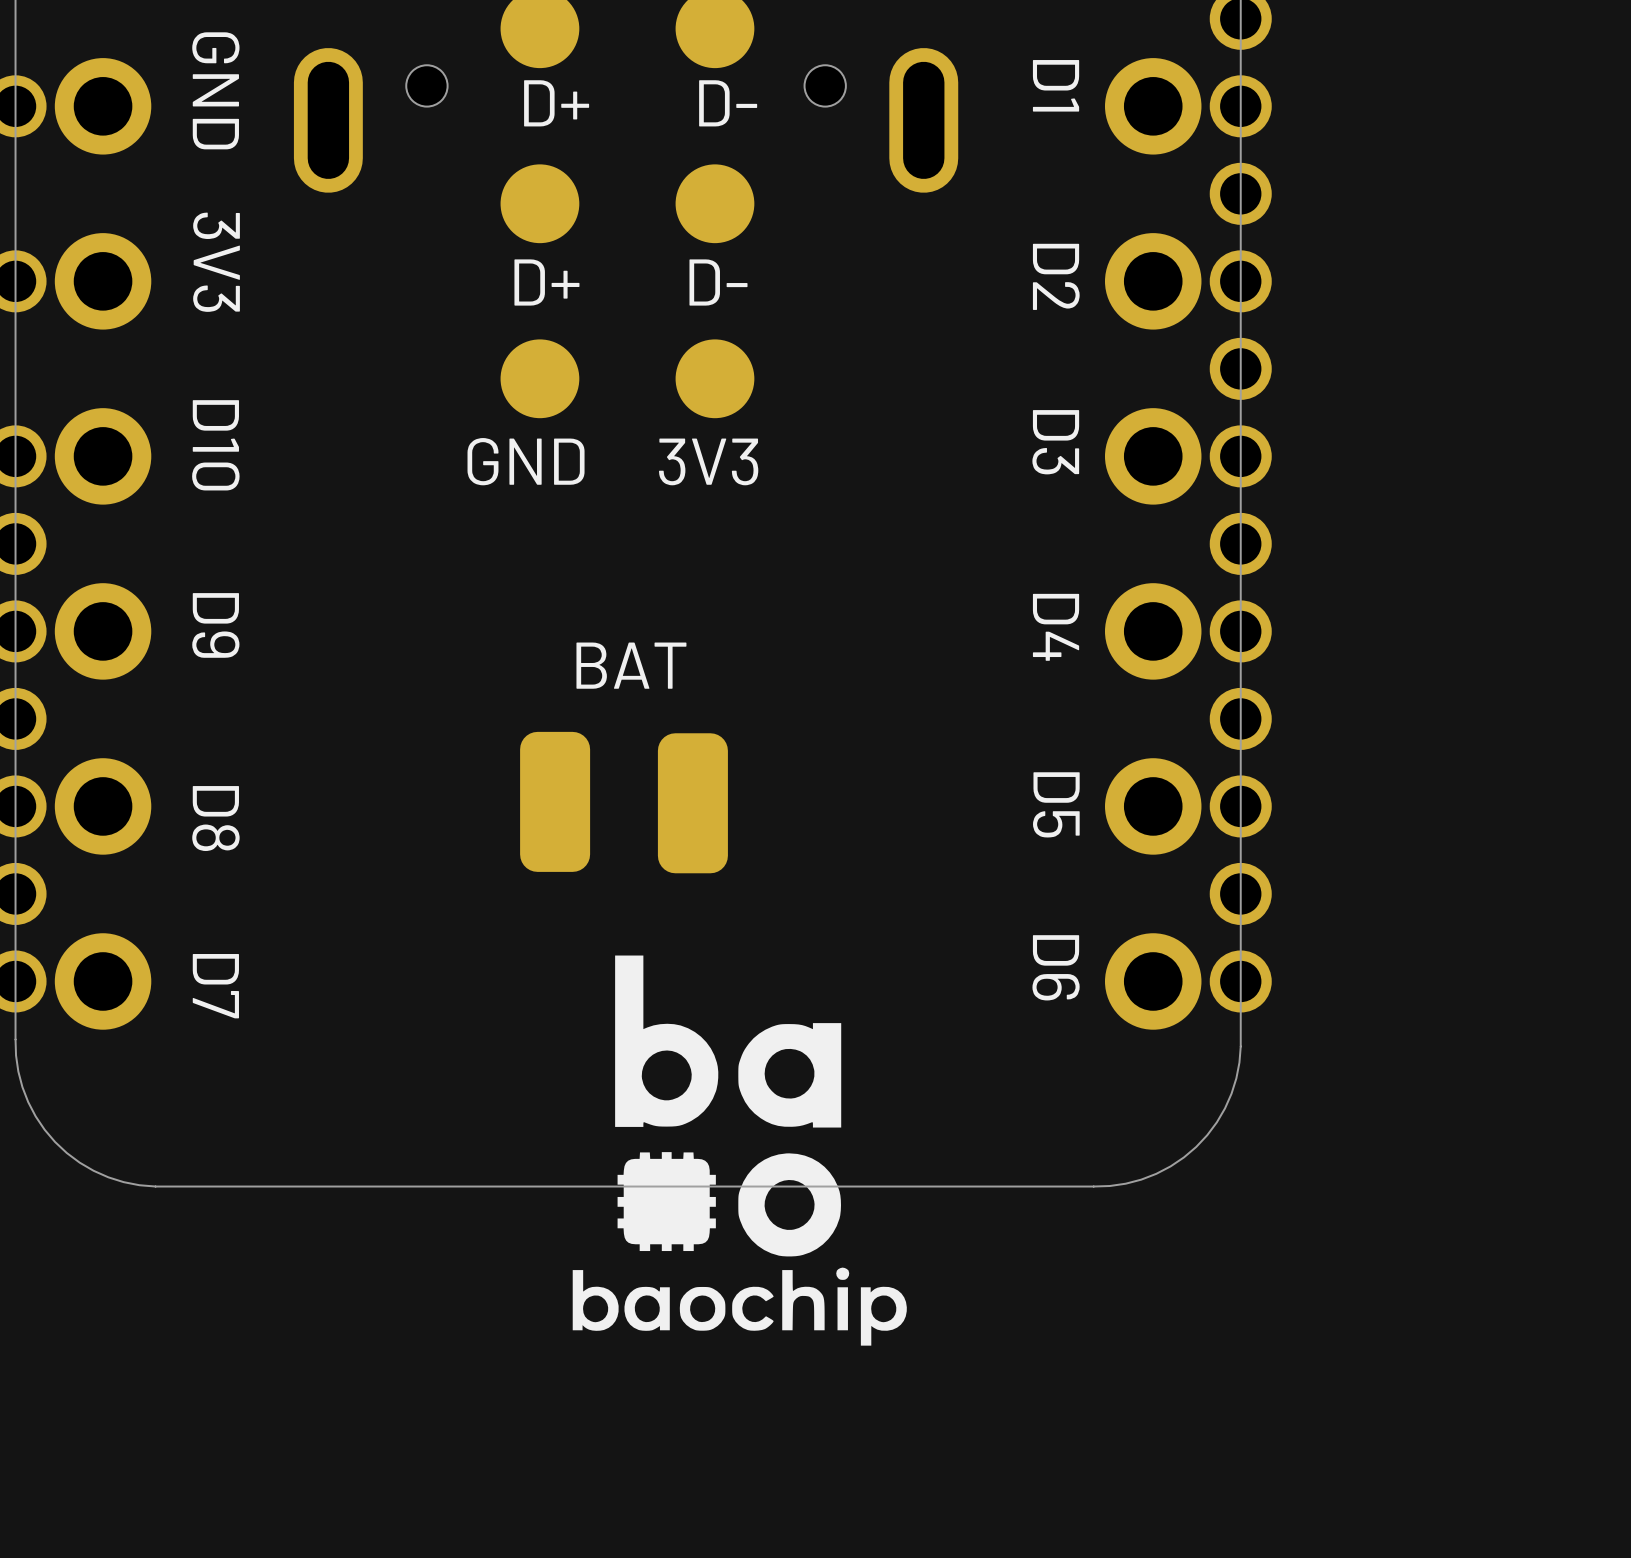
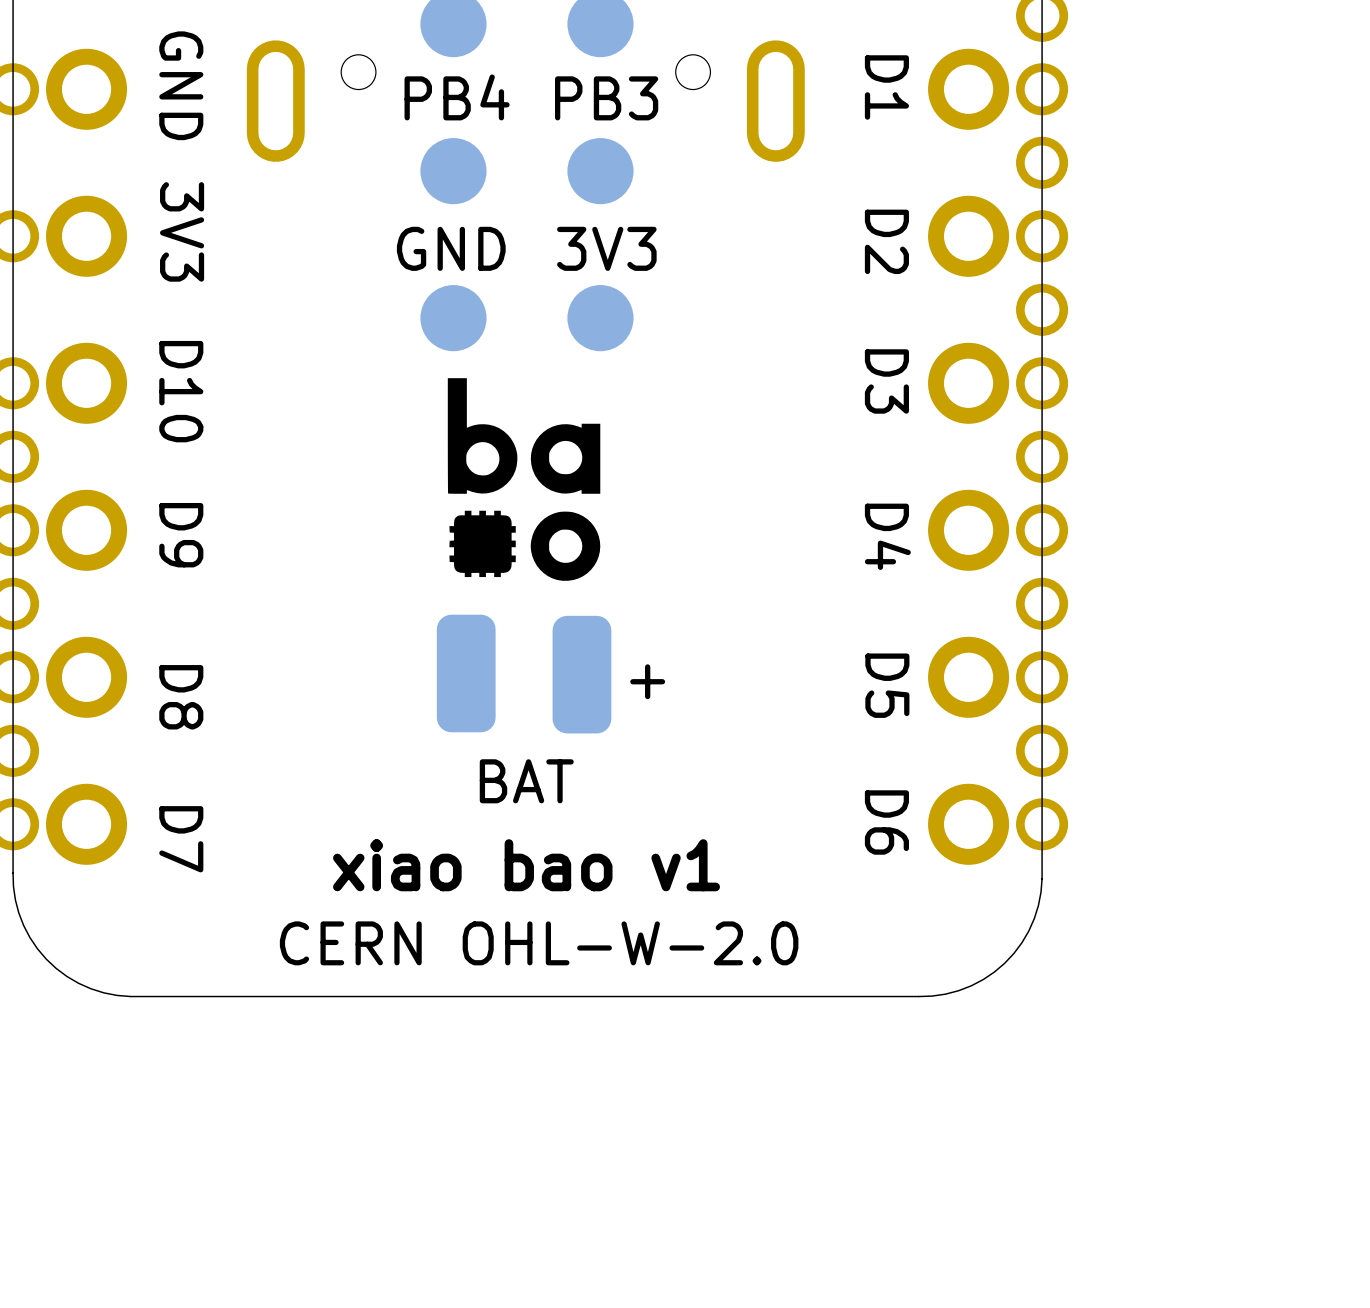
text: D+ (556, 103) -> PB4 (457, 97)
text: D- (728, 103) -> PB3 (606, 98)
text: D+ (546, 282) -> GND (451, 248)
text: D- (718, 282) -> 3V3 (606, 248)
drawing: none -> [447, 378, 601, 581]
text: GND (526, 461) -> none
text: 3V3 (708, 461) -> none
text position: BAT (631, 665) -> BAT (526, 781)
text: none -> + (647, 681)
drawing: [572, 955, 907, 1346] -> none
text: none -> xiao bao v1 (526, 865)
text: none -> CERN OHL-W-2.0 (539, 943)

